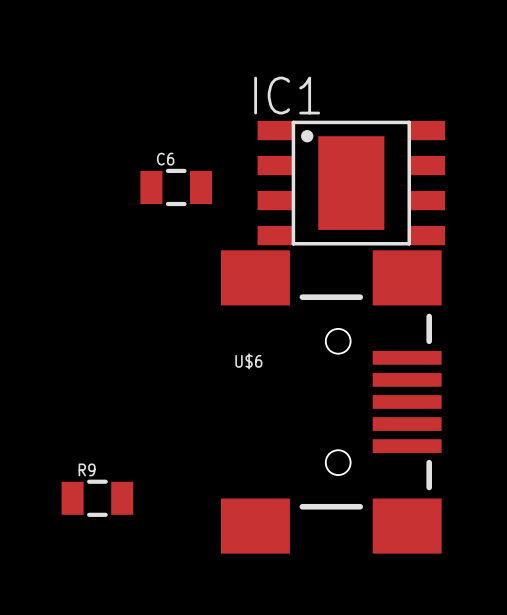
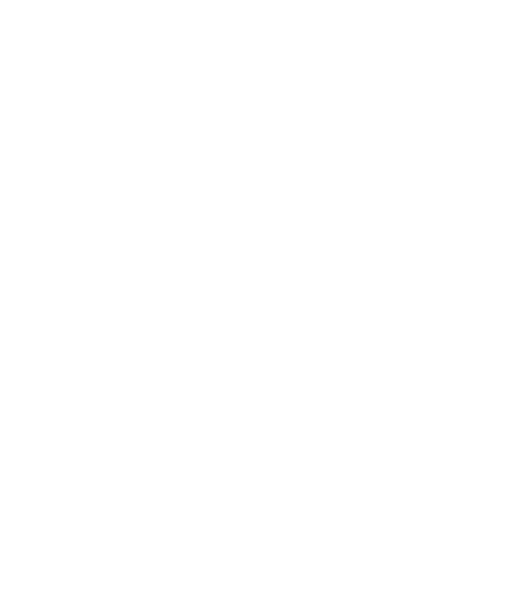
IC1: (351, 183) -> none
C6: (176, 187) -> none
U$6: (331, 401) -> none
R9: (97, 498) -> none

